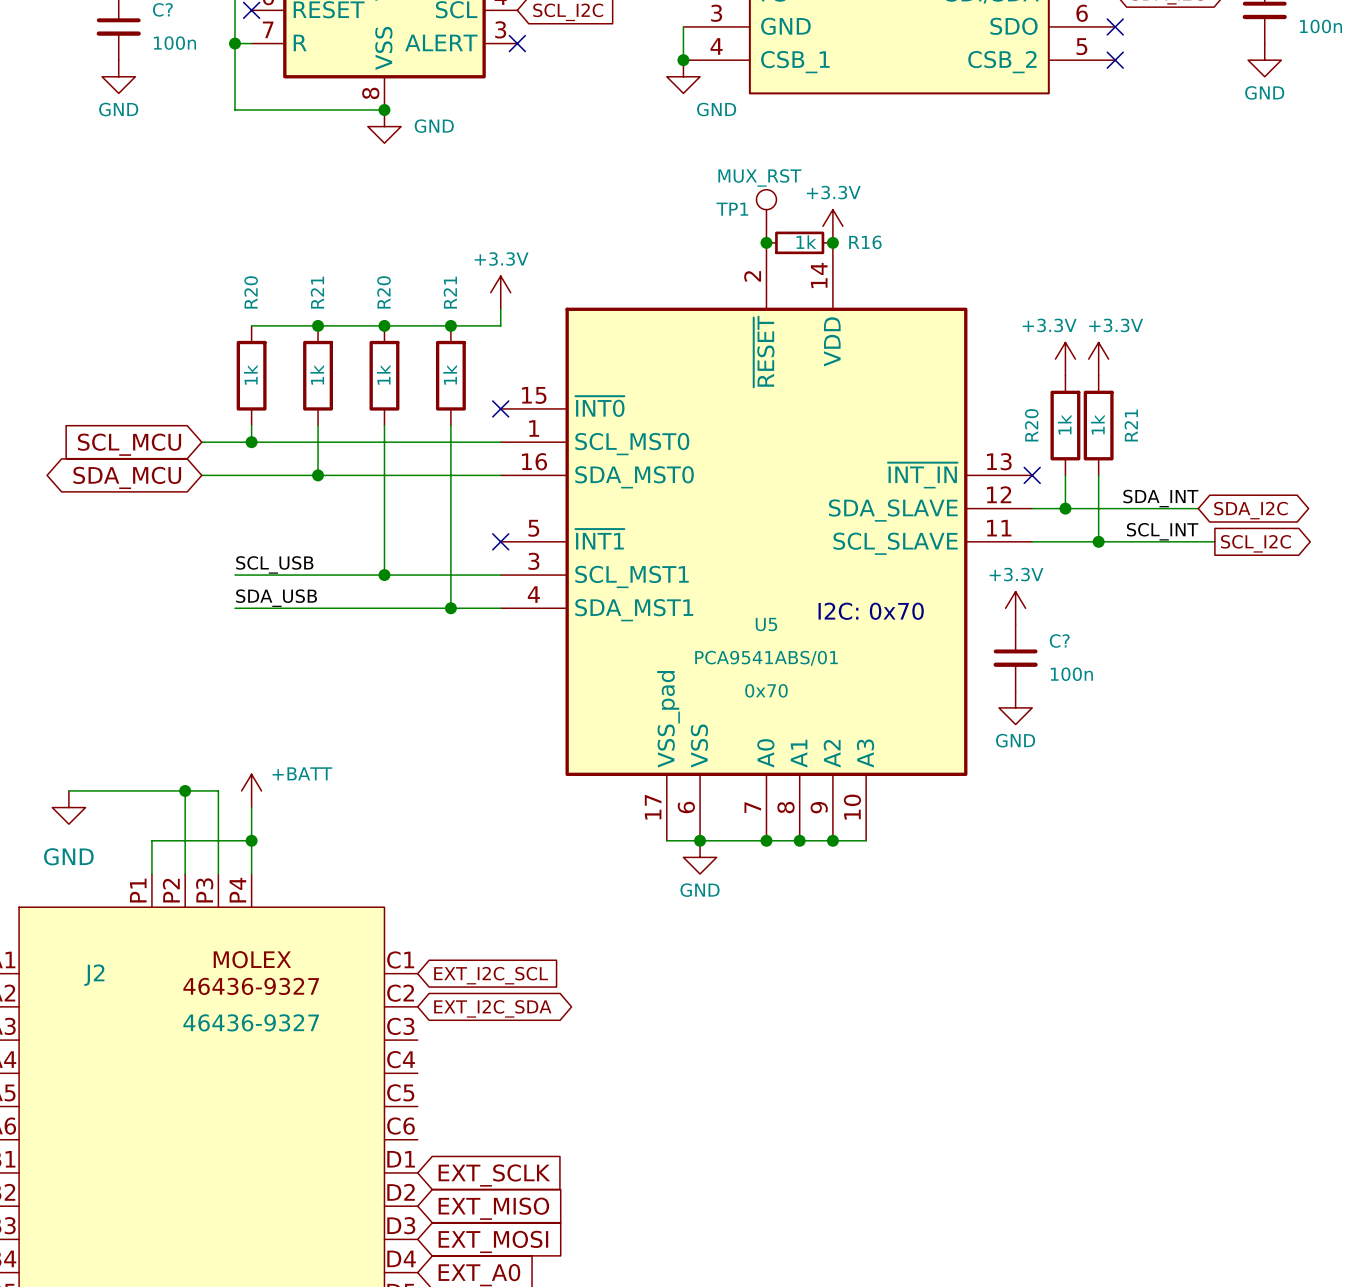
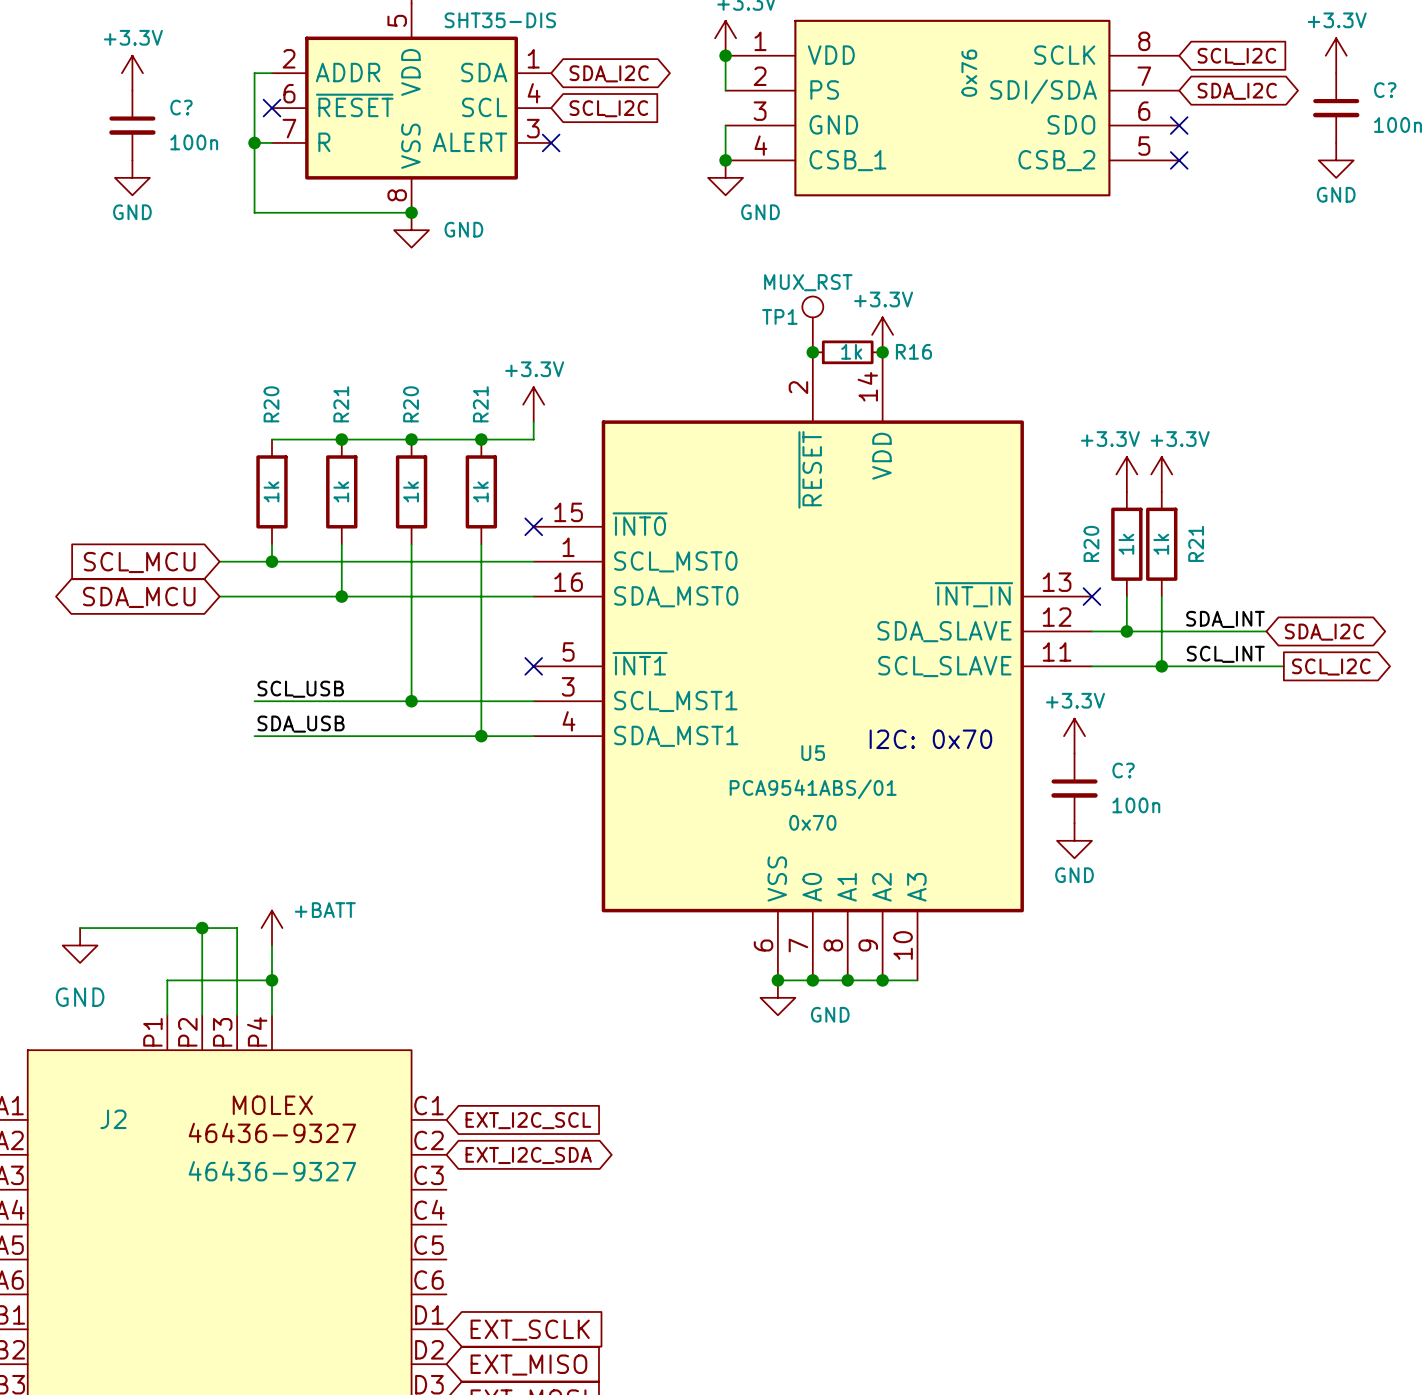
U5 symbol: [500, 242, 1033, 841] -> [533, 352, 1092, 981]
wire: (666, 840) (733, 840) -> none
junction position: (700, 840) -> (777, 980)
power symbol position: GND (700, 857) -> GND (777, 997)
power symbol text position: GND (700, 890) -> GND (830, 1014)

